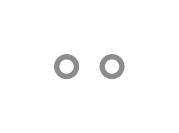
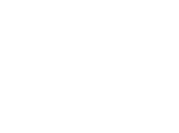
part: (89, 66) -> none

